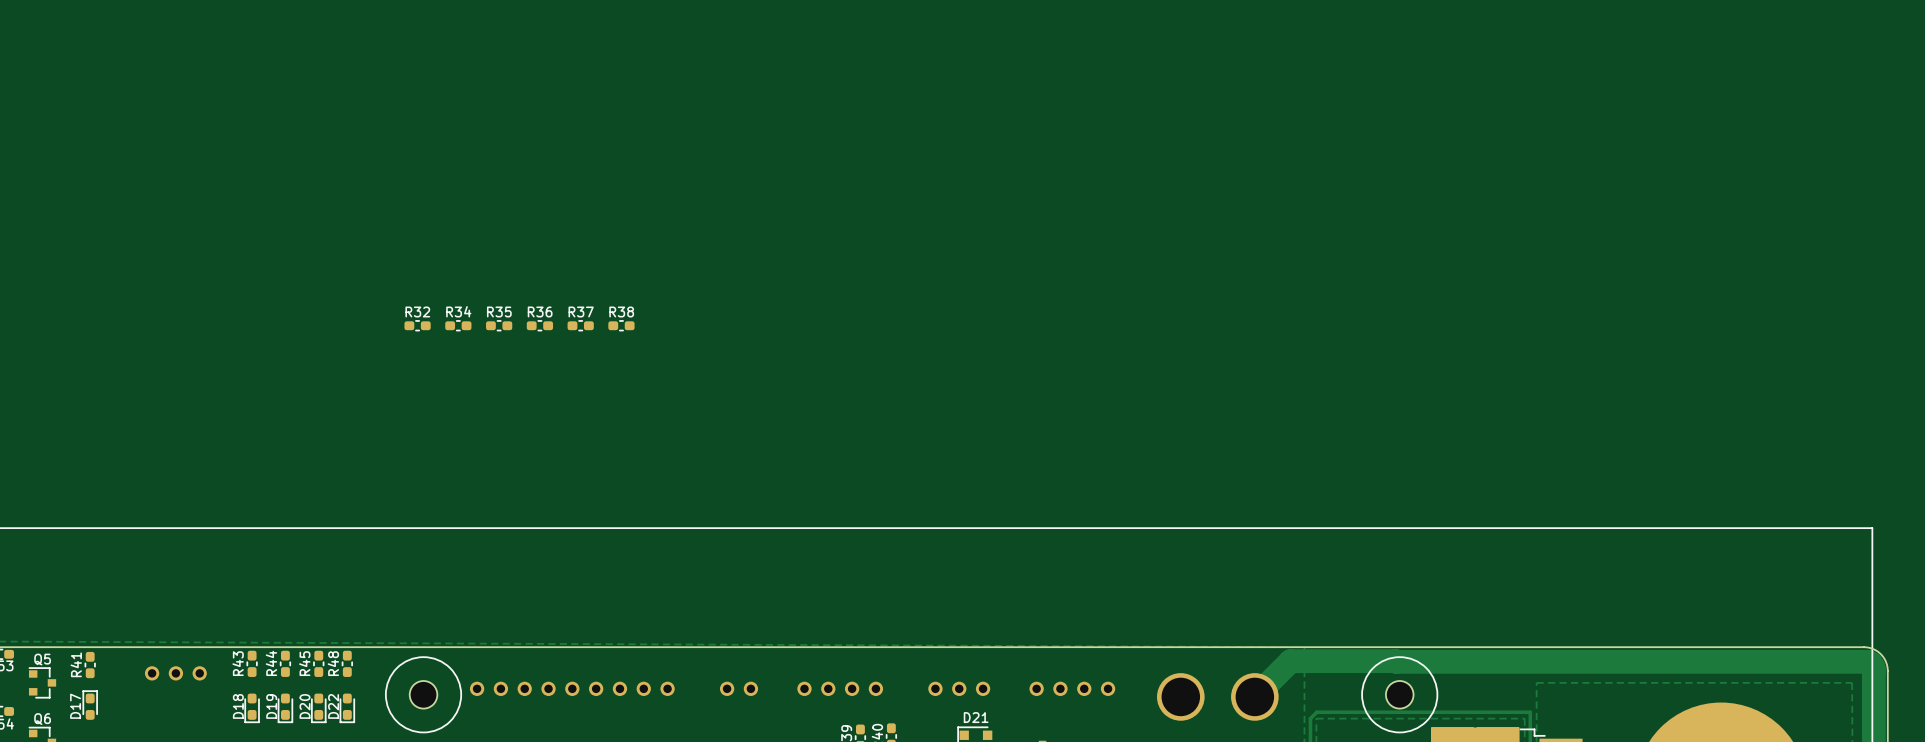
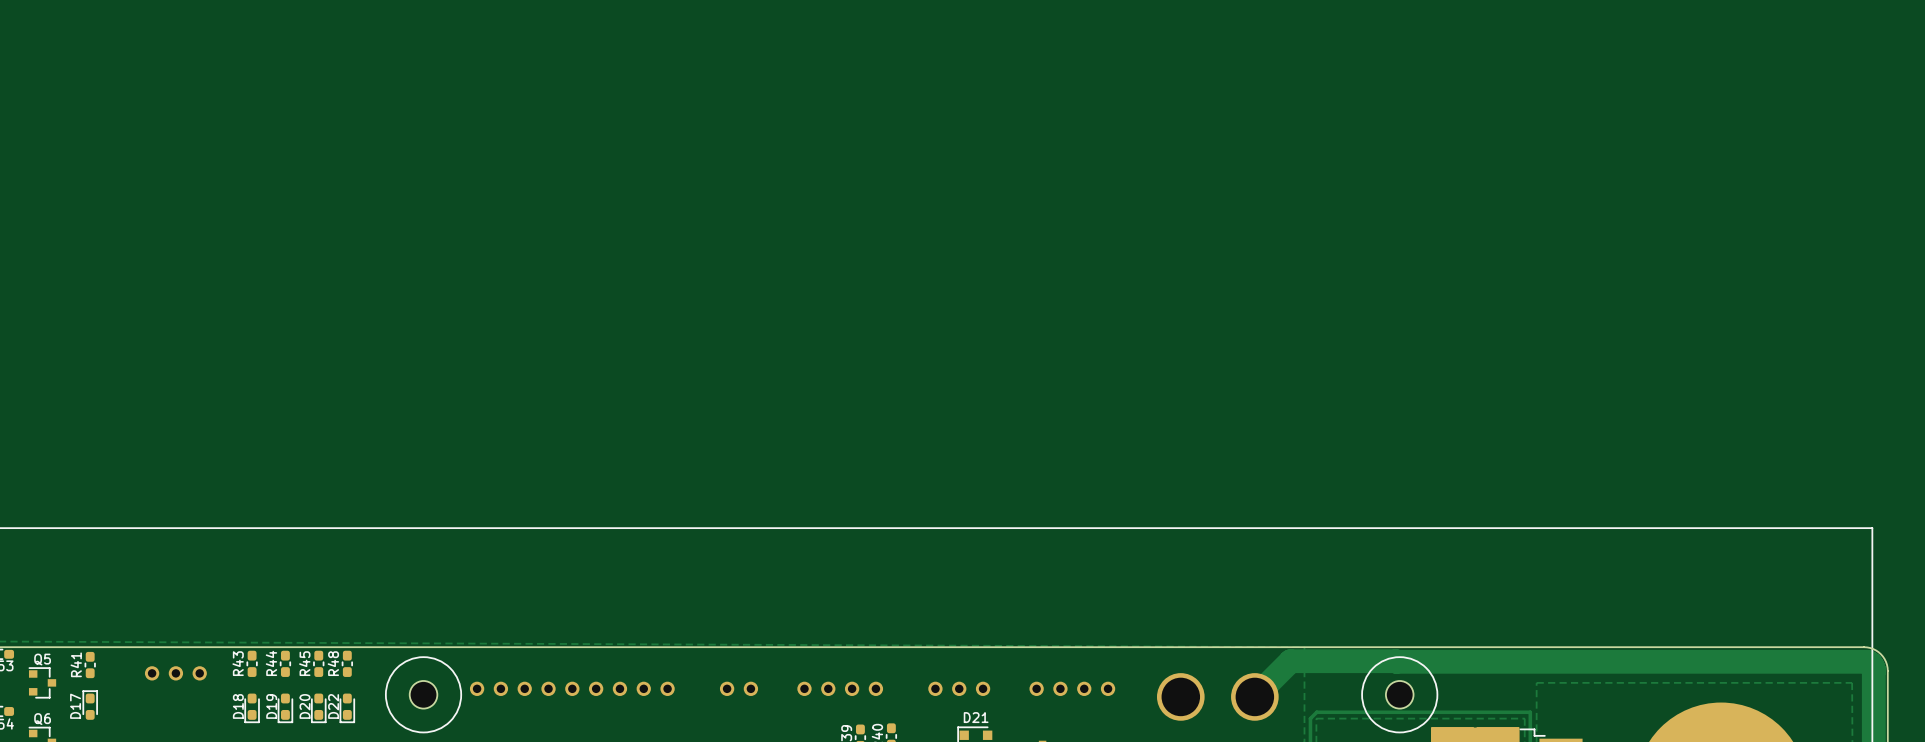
R32: (417, 325) -> none
R34: (458, 325) -> none
R35: (499, 325) -> none
R36: (539, 325) -> none
R37: (580, 325) -> none
R38: (621, 325) -> none

